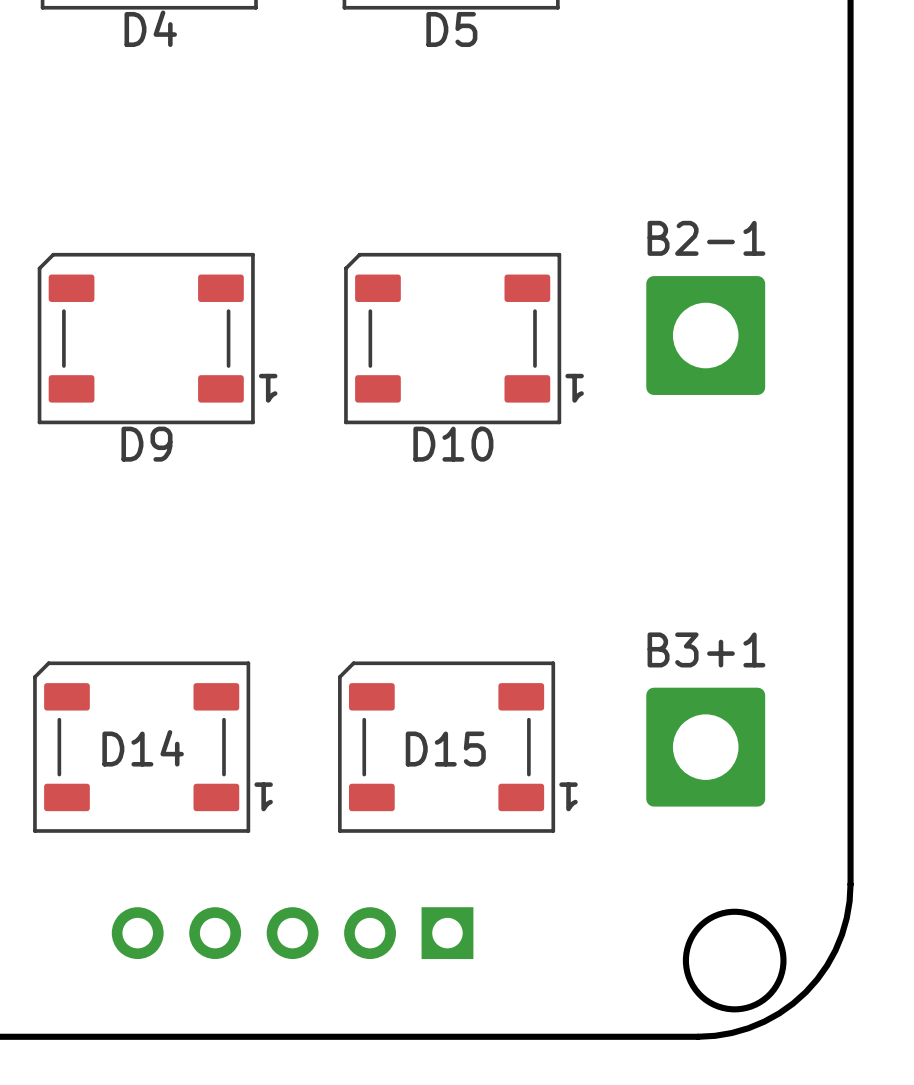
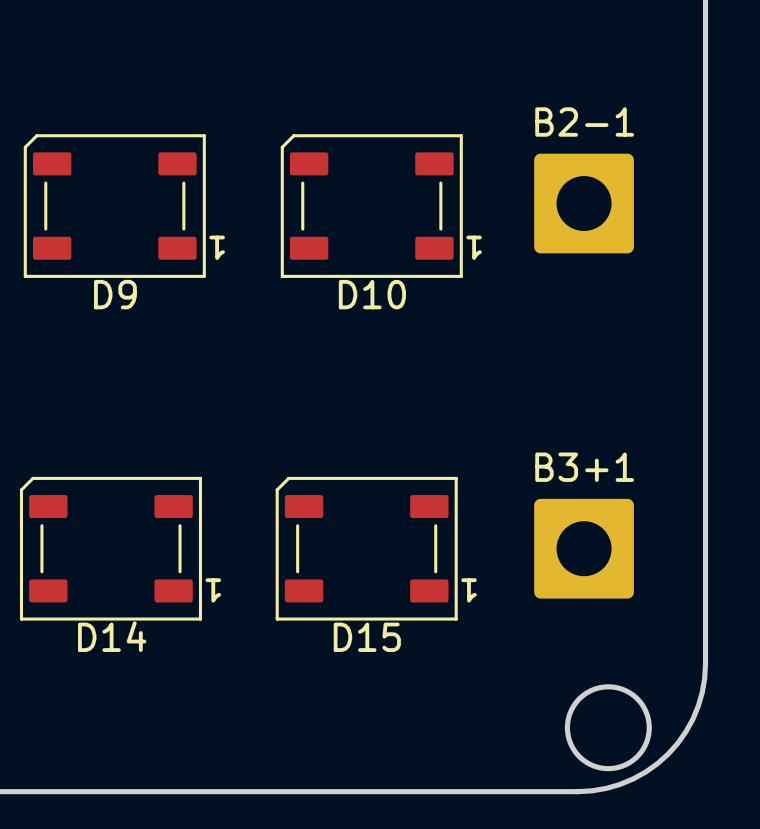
D14 name position: D14 (143, 748) -> D14 (112, 636)
D15 name position: D15 (445, 749) -> D15 (367, 637)
part: (292, 933) -> none

